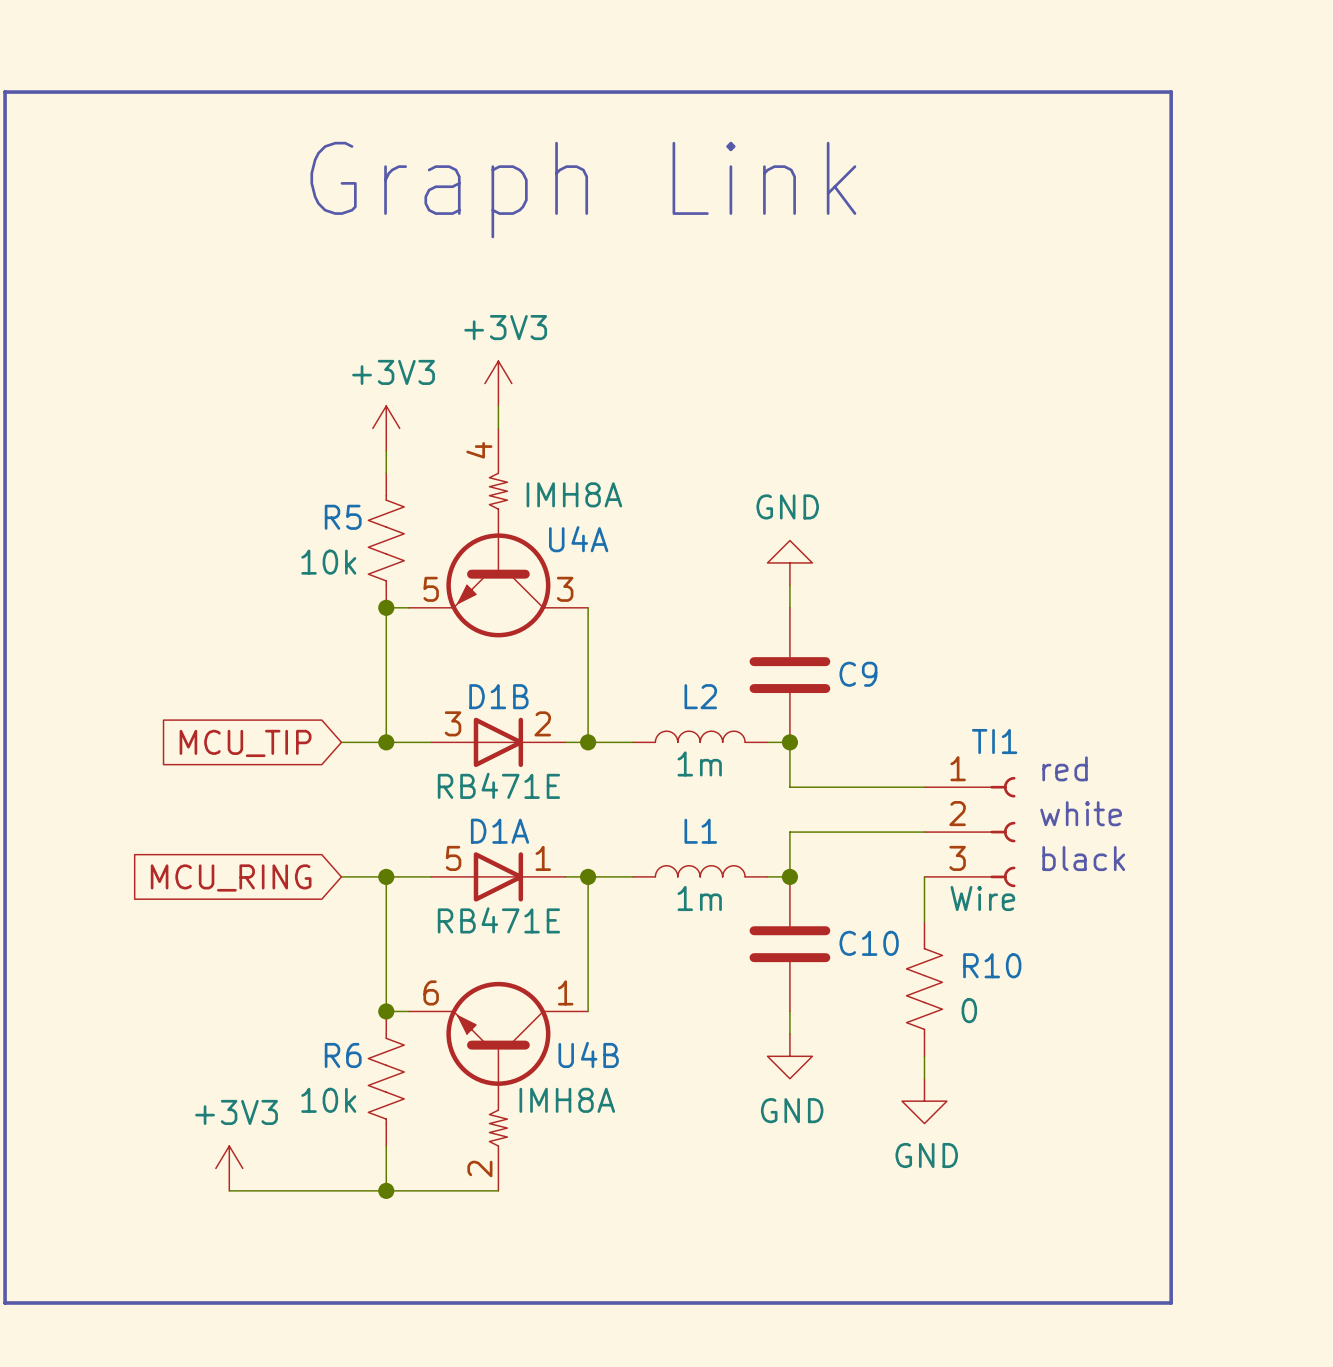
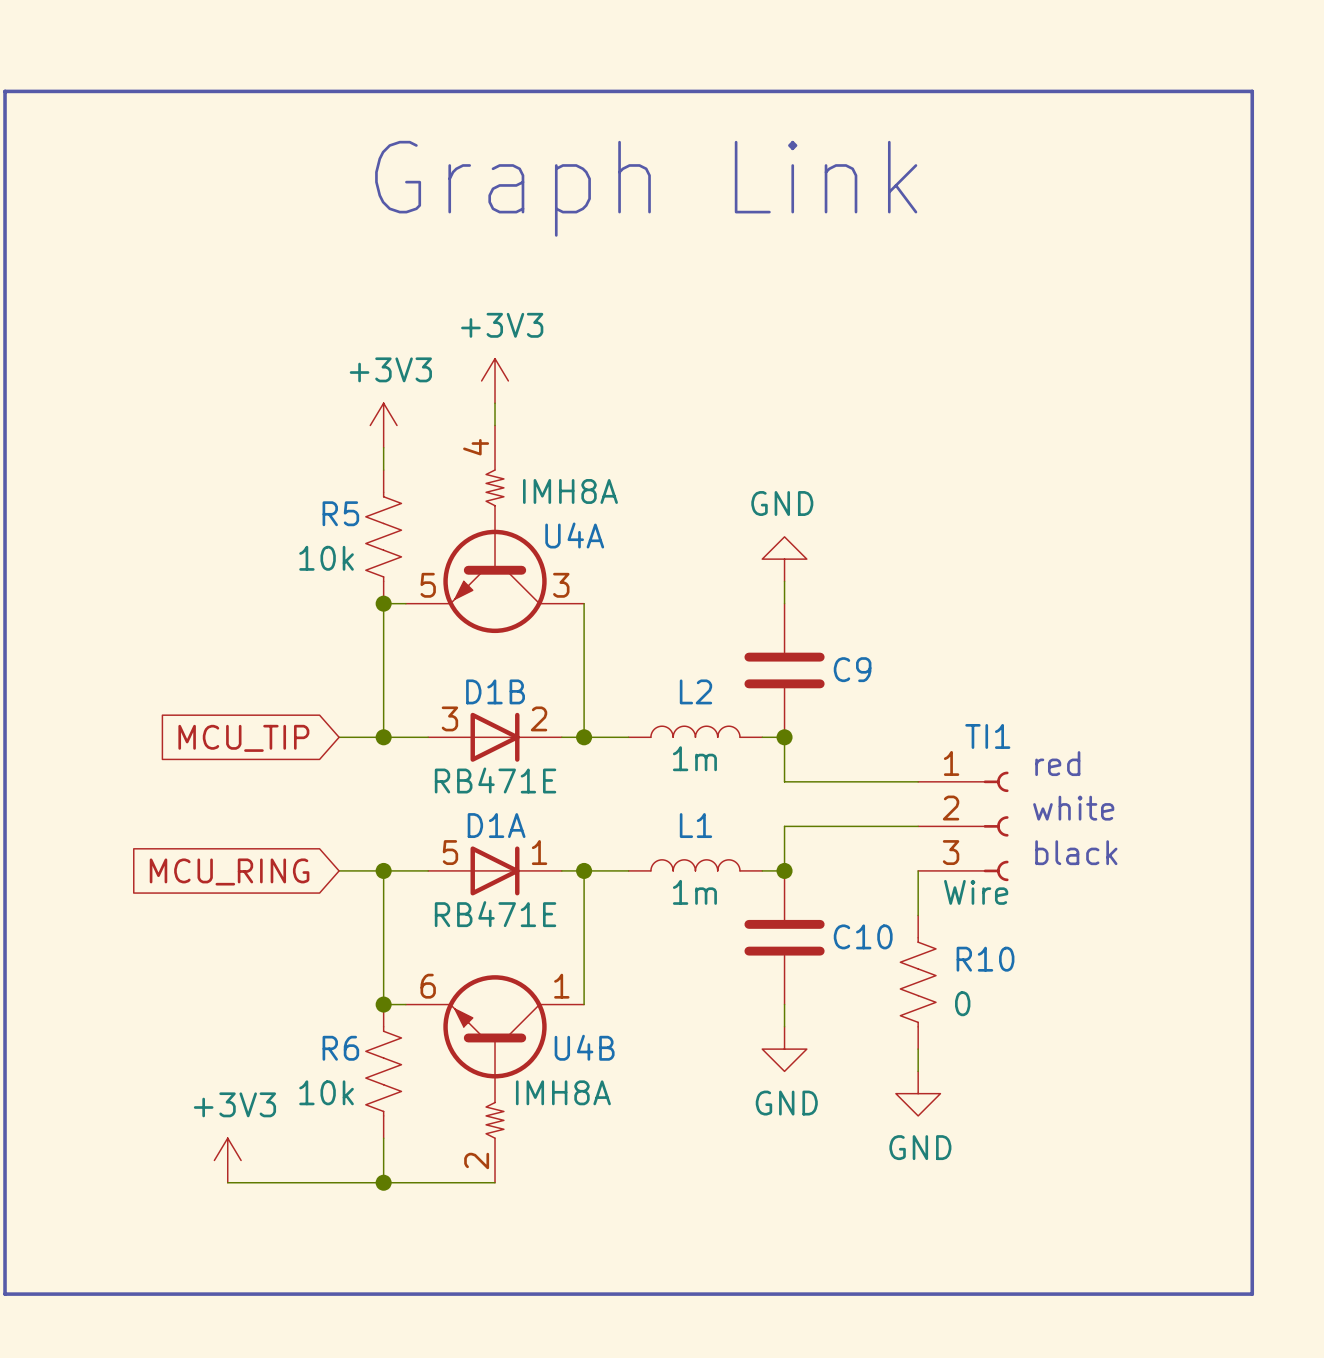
line: (1171, 92) (1171, 1302) -> (1163, 91) (1252, 91) (1252, 1294) (1163, 1294)
text position: Graph Link (583, 190) -> Graph Link (646, 188)

